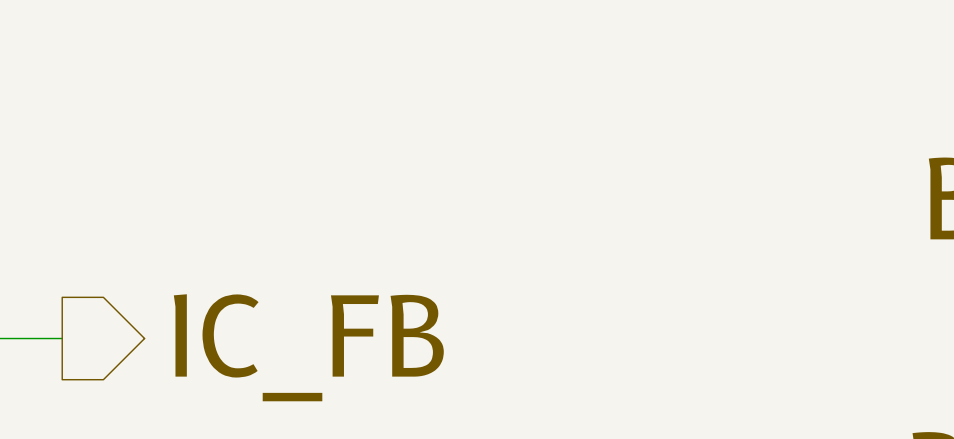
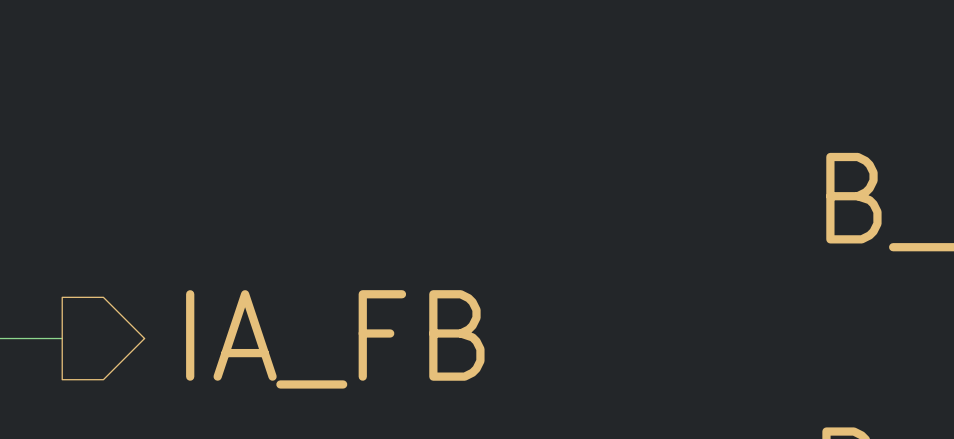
hierarchical label: IC_FB (308, 347) -> IA_FB (335, 339)

